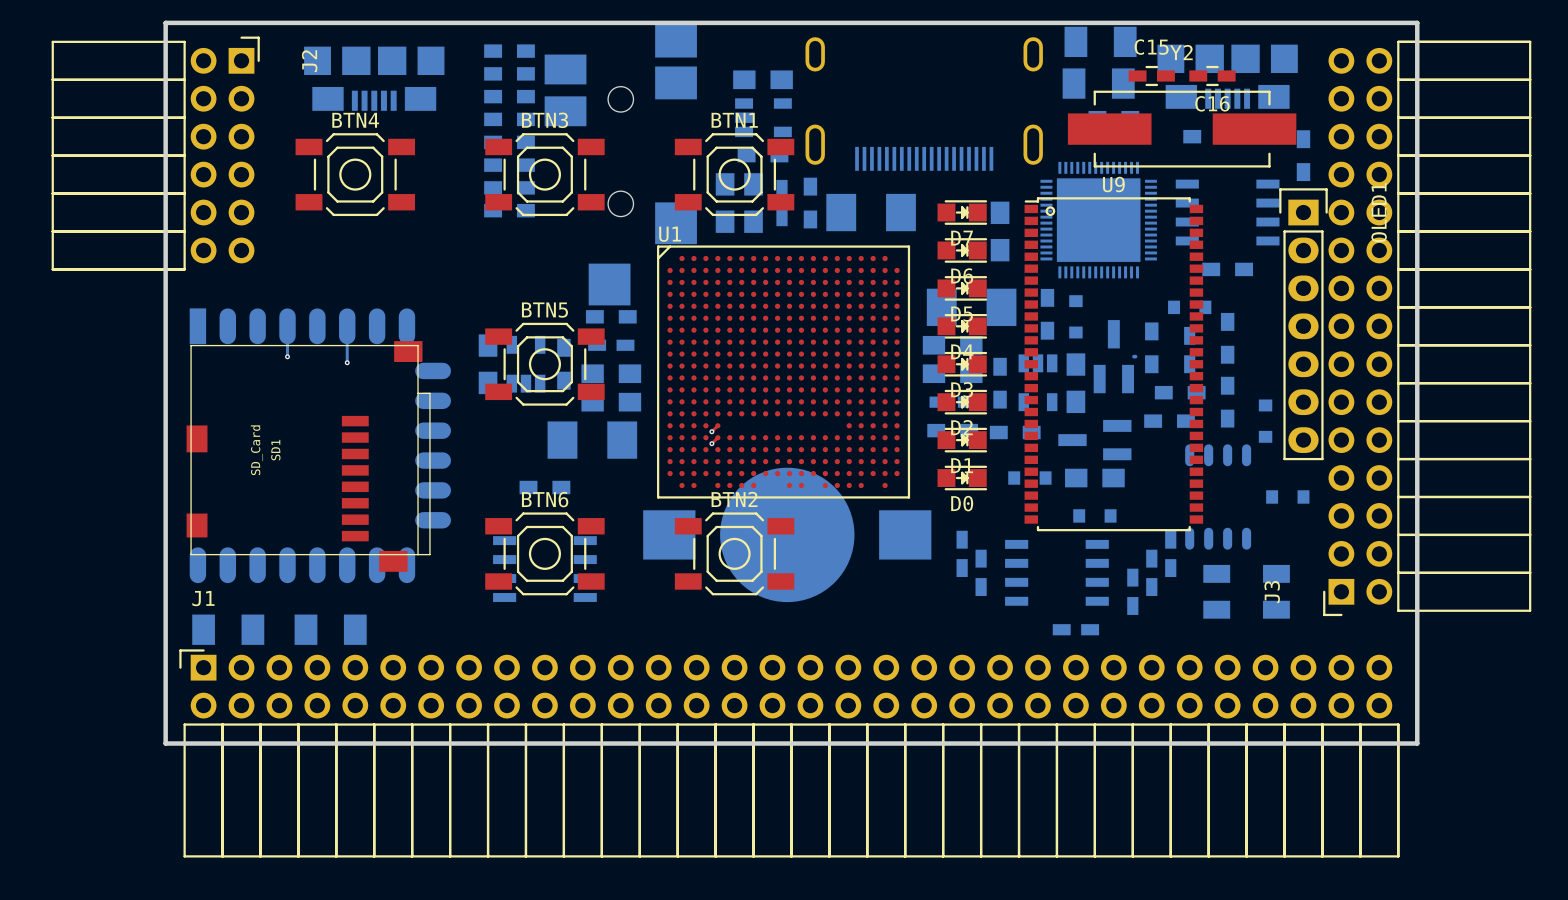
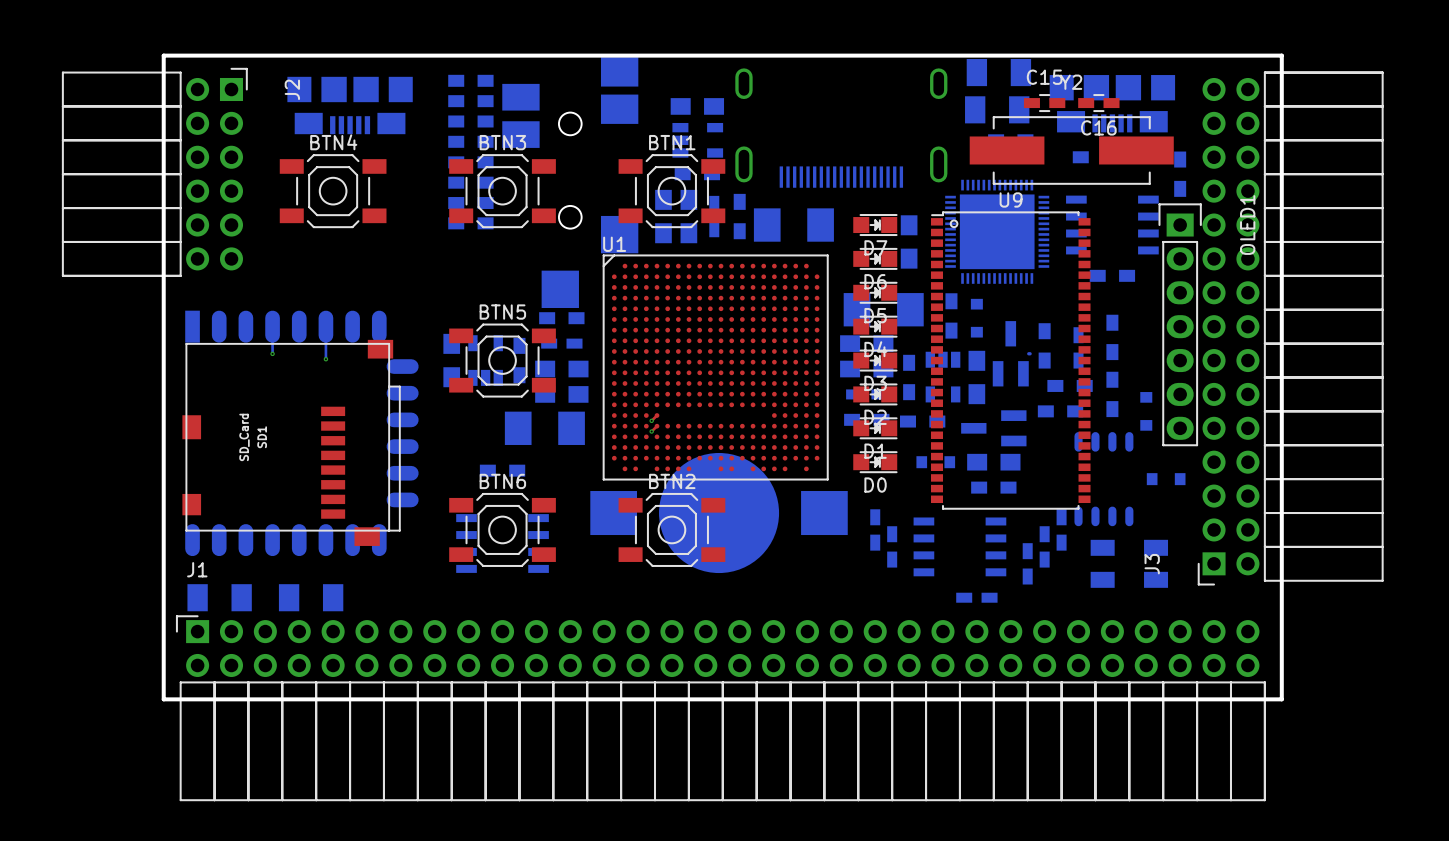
part: (1189, 307) -> none
part footprint: [1073, 509, 1117, 523] -> [971, 481, 1017, 494]

